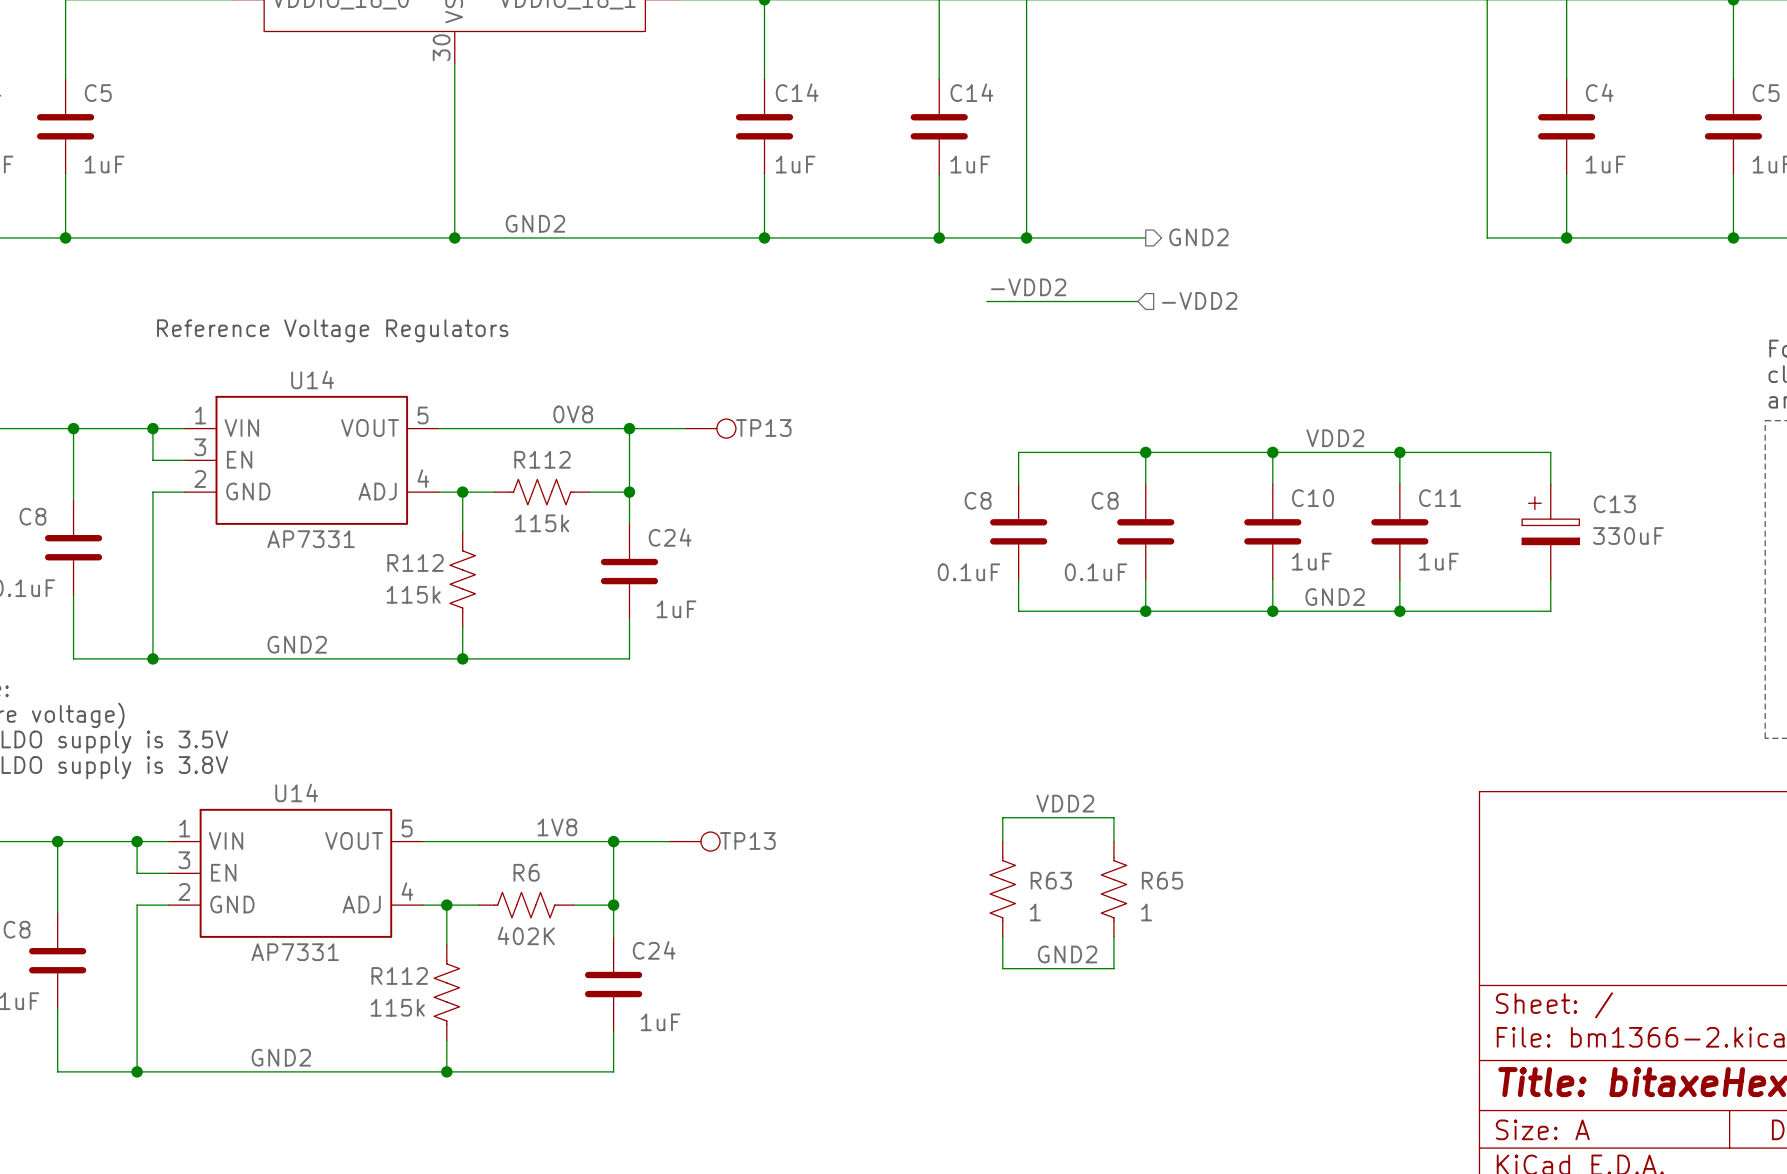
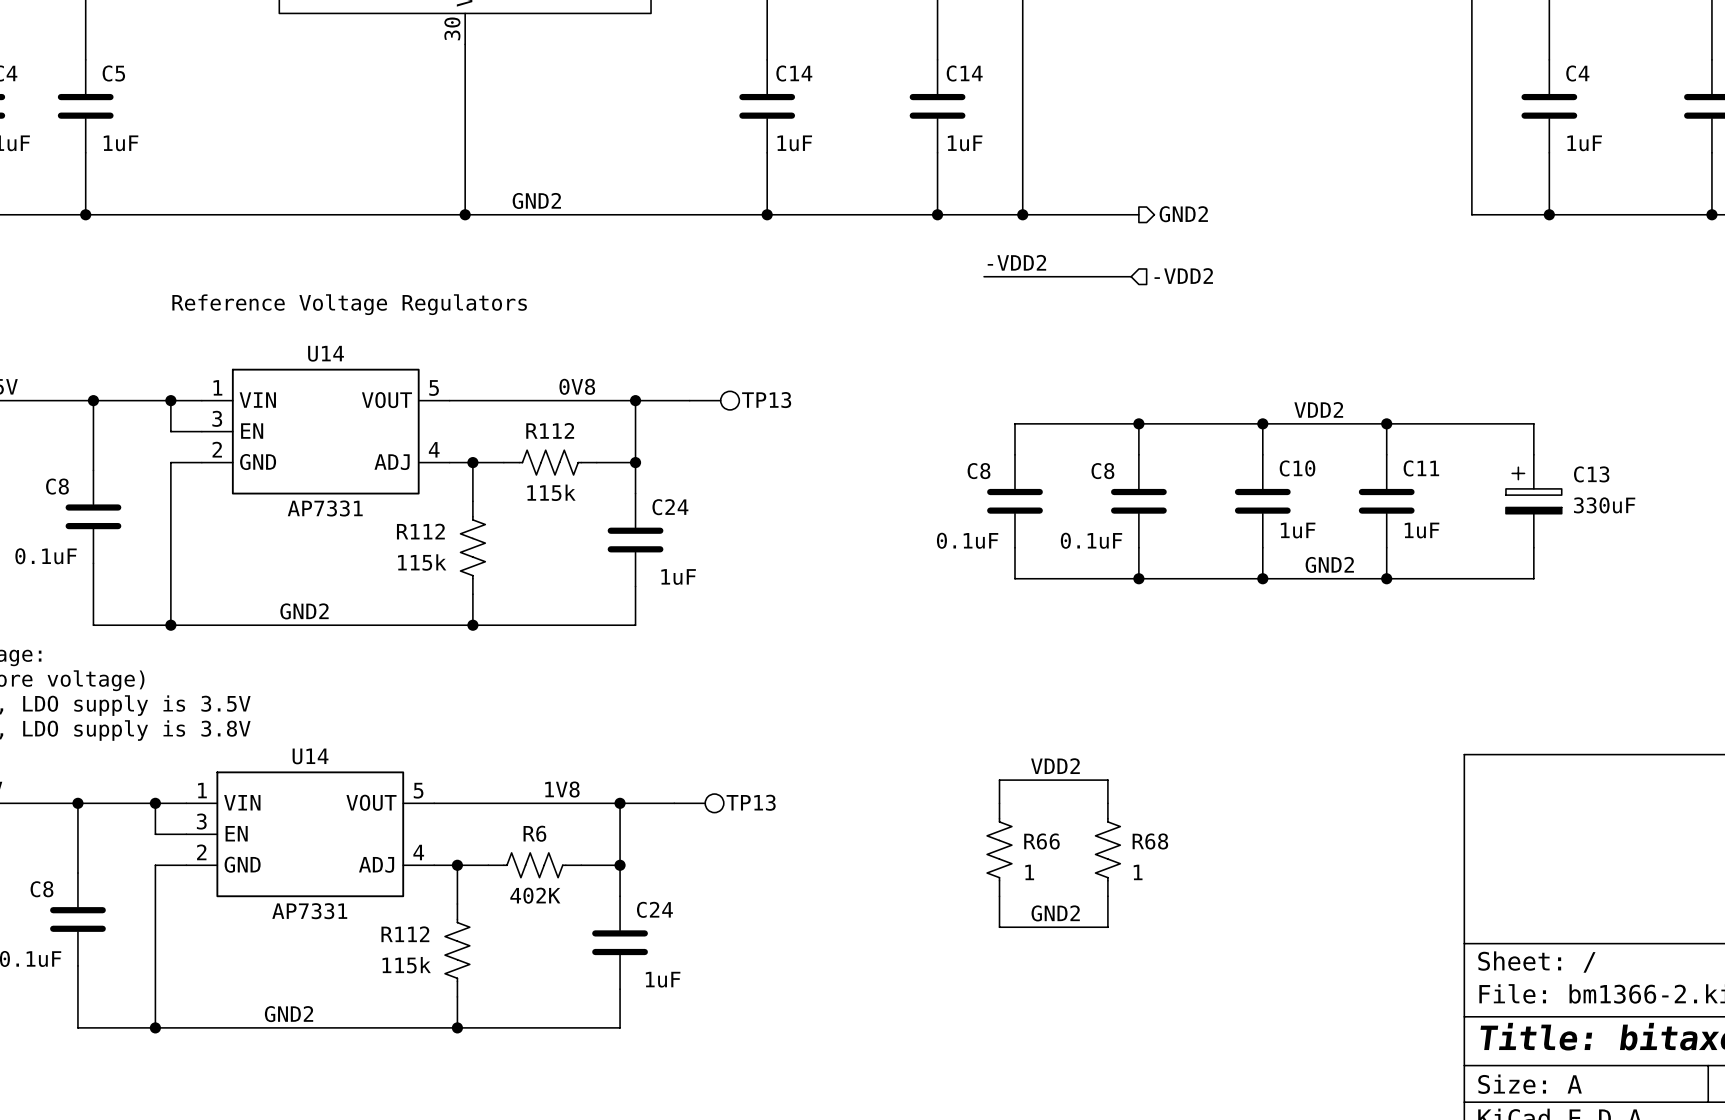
R63 name: R63 (1051, 880) -> R66 (1041, 841)
R65 name: R65 (1162, 880) -> R68 (1150, 841)

